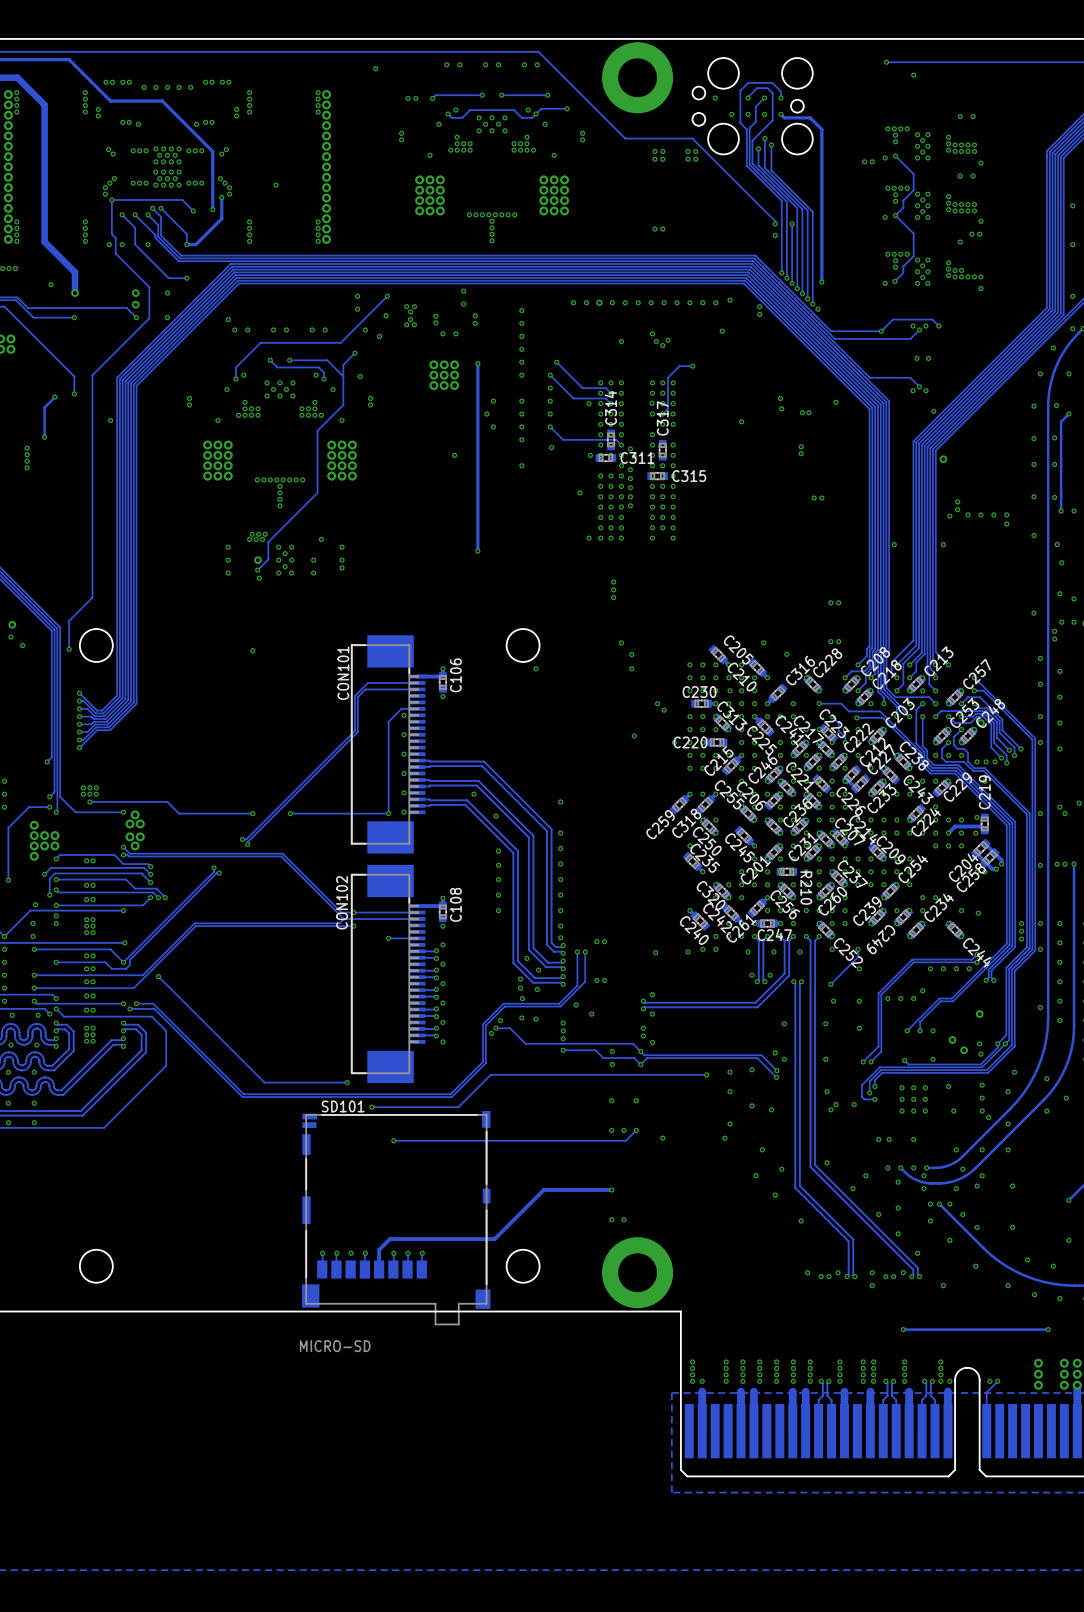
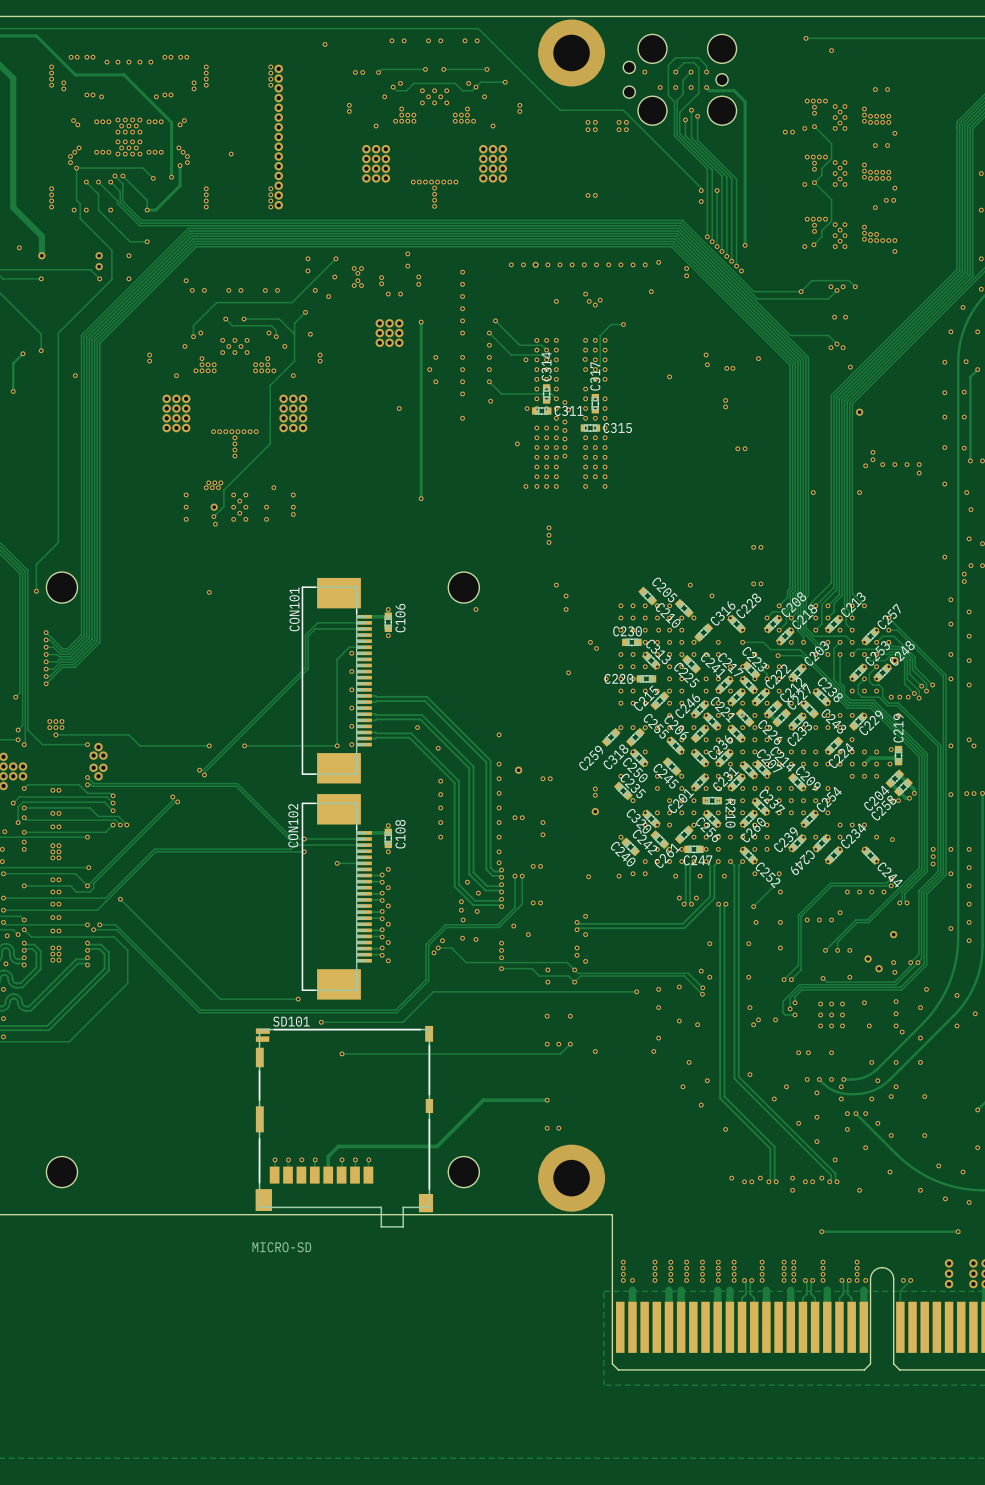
via: none -> (518, 770)
via: none -> (657, 776)
via: none -> (542, 778)
via: none -> (550, 778)
via: none -> (657, 788)
via: none -> (595, 788)
via: none -> (595, 795)
via: none -> (595, 811)
via: none -> (514, 817)
via: none -> (522, 817)
via: none -> (542, 822)
via: none -> (542, 834)

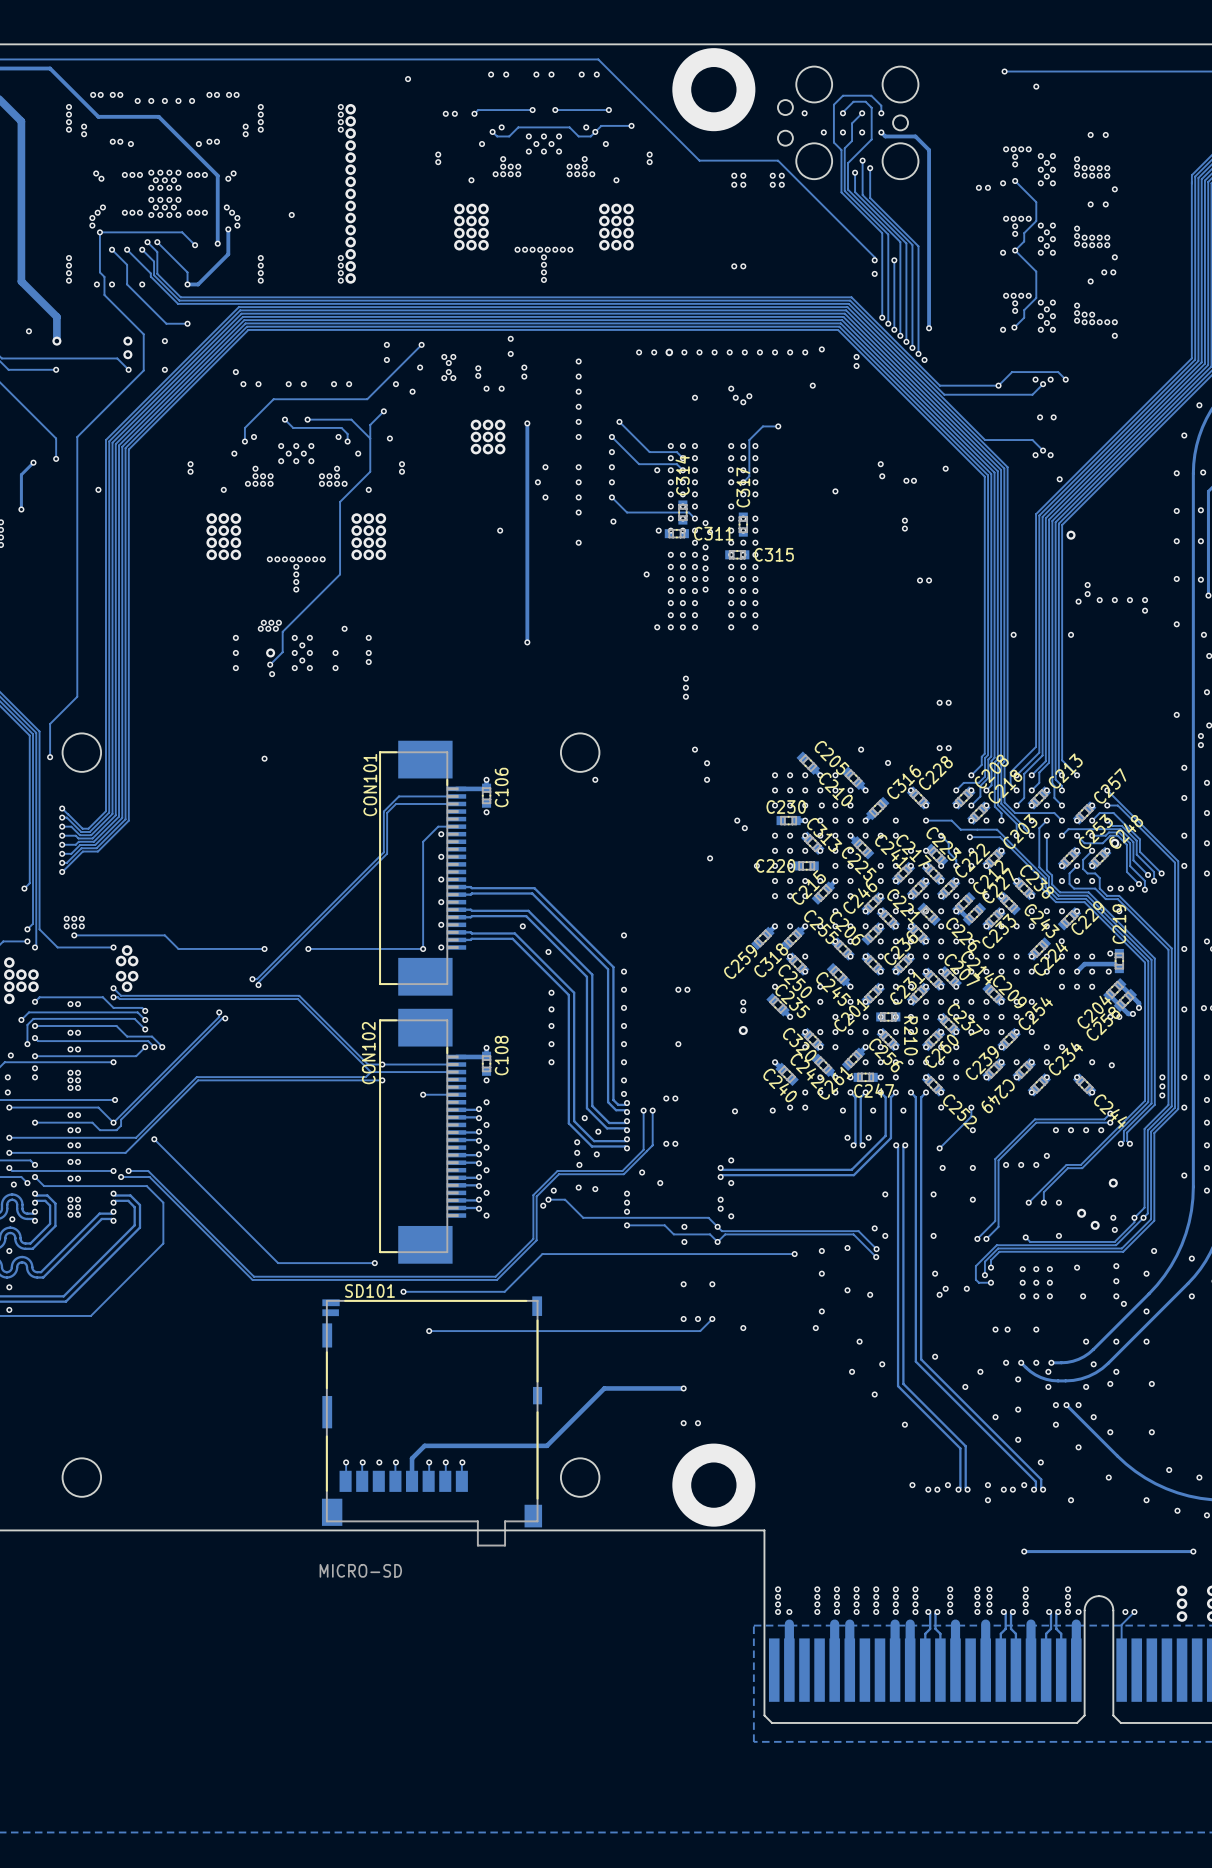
via: (518, 770) -> none
via: (514, 817) -> none
via: (522, 817) -> none
via: (542, 834) -> none

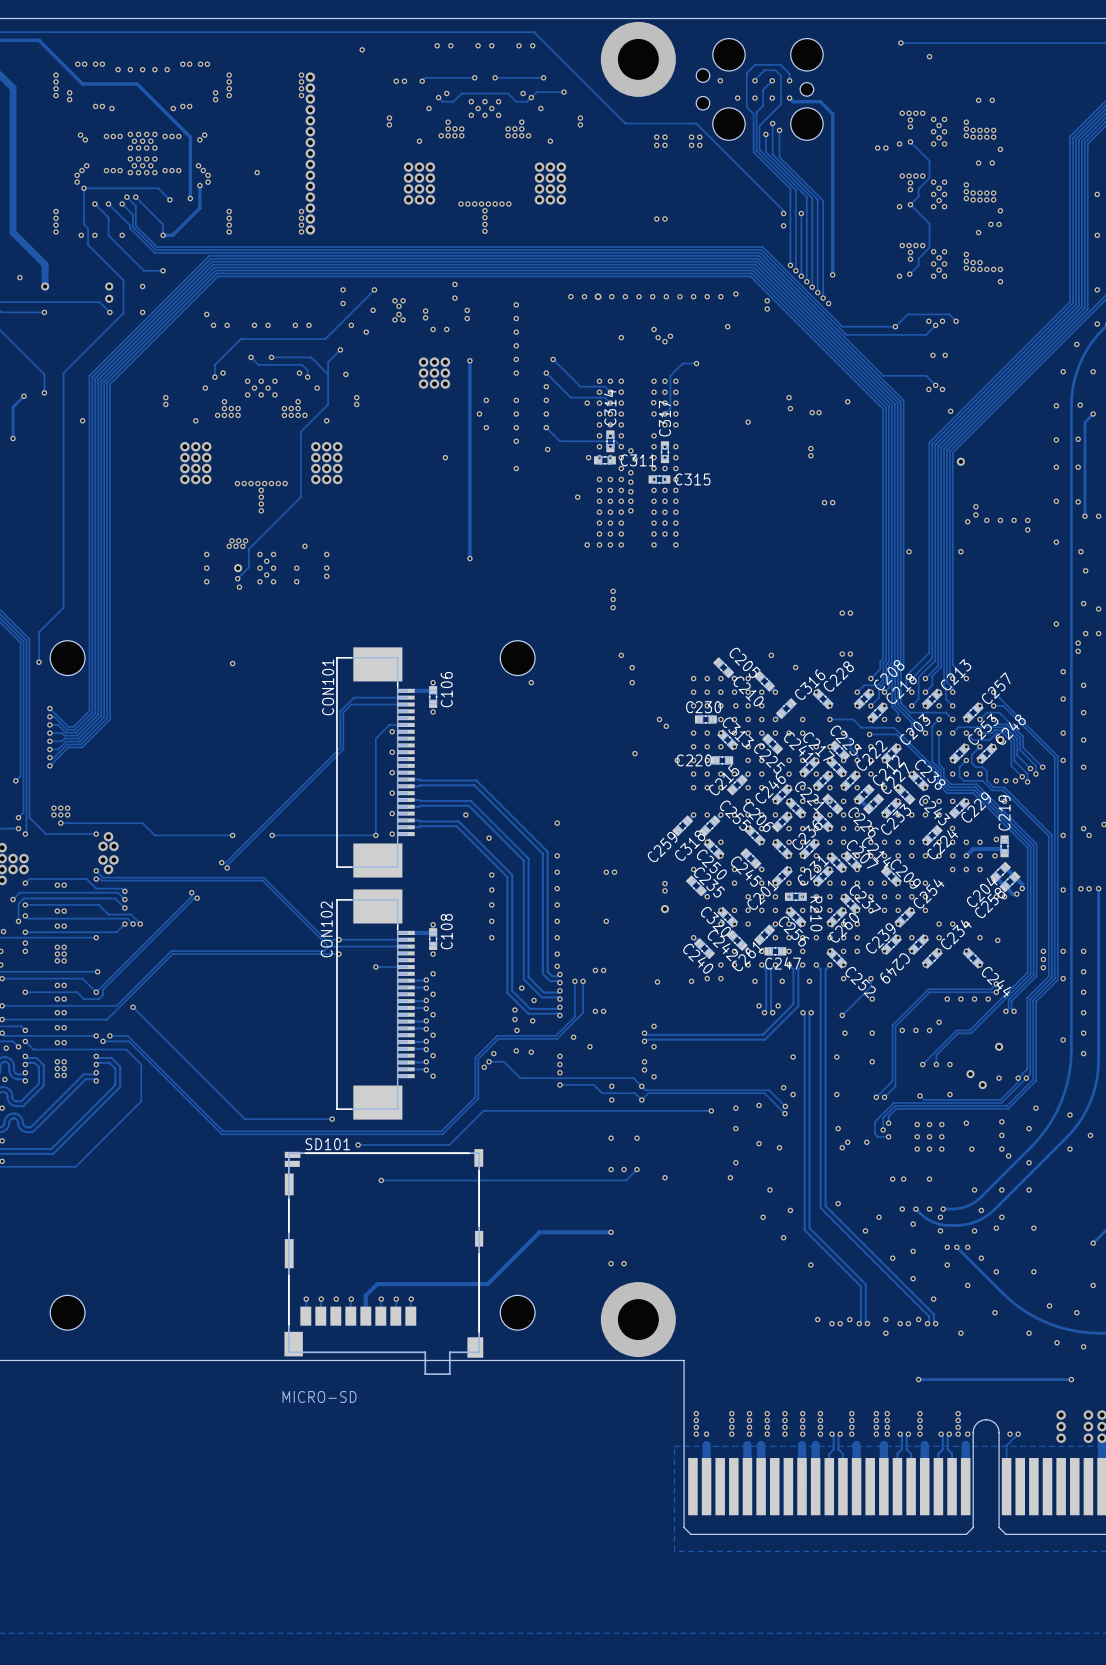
via: (1114, 1229) -> none

